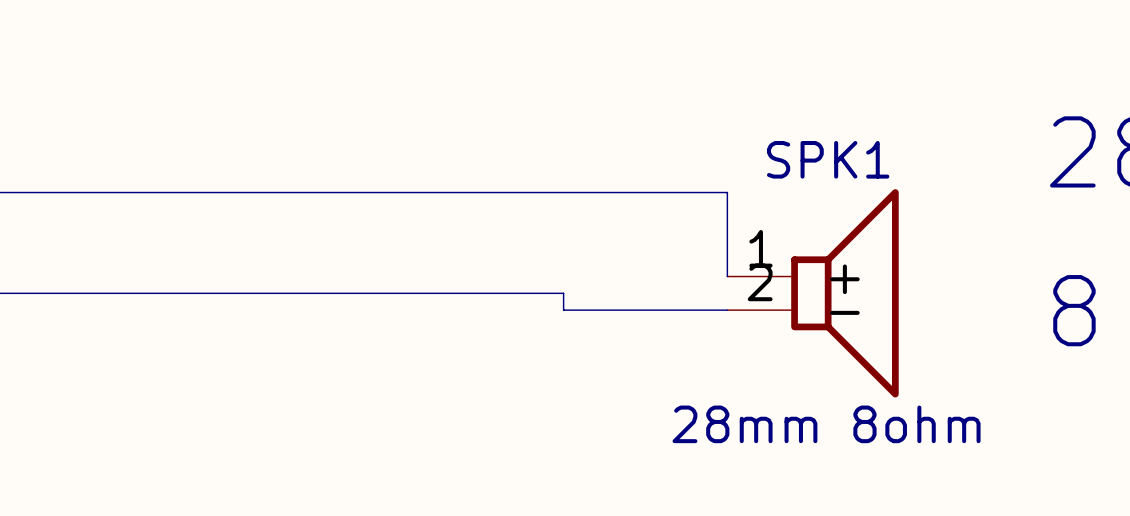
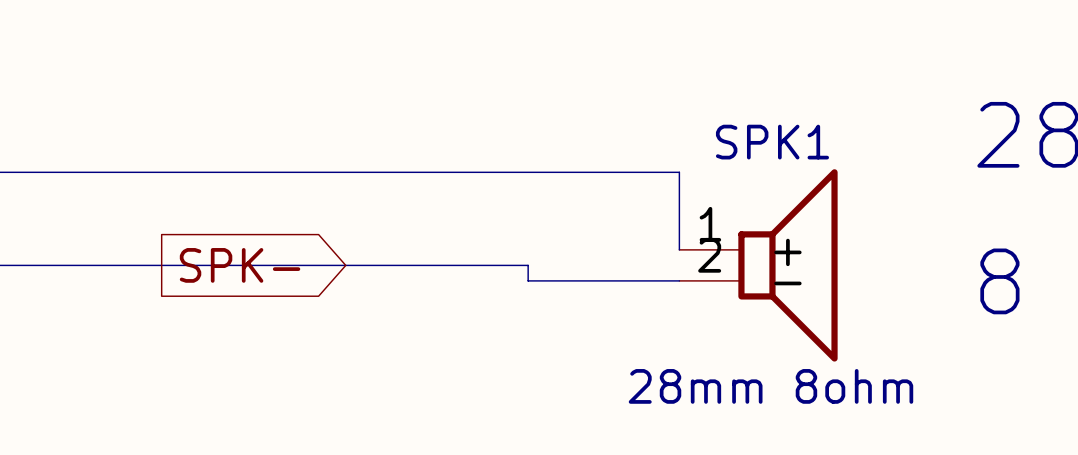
global label: none -> SPK- (240, 265)

